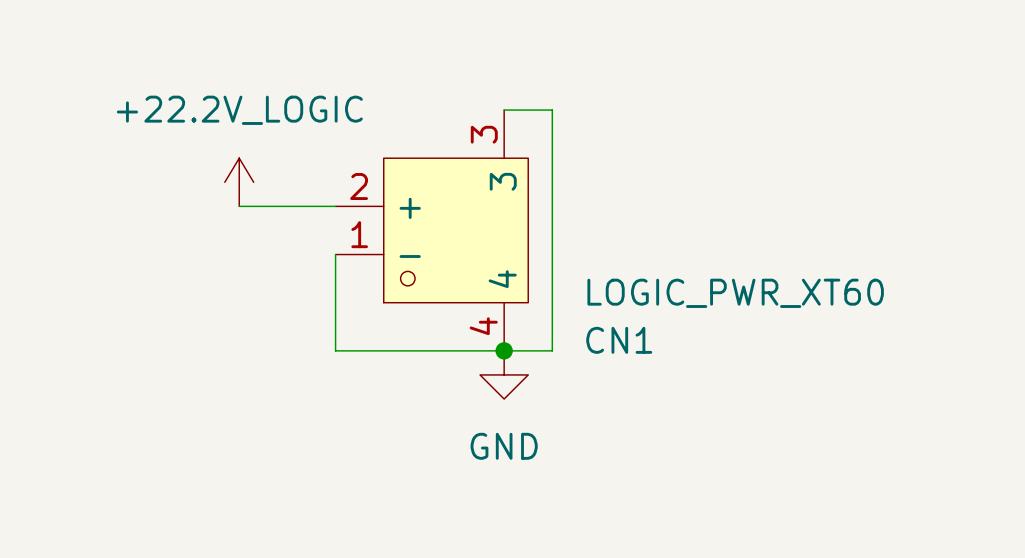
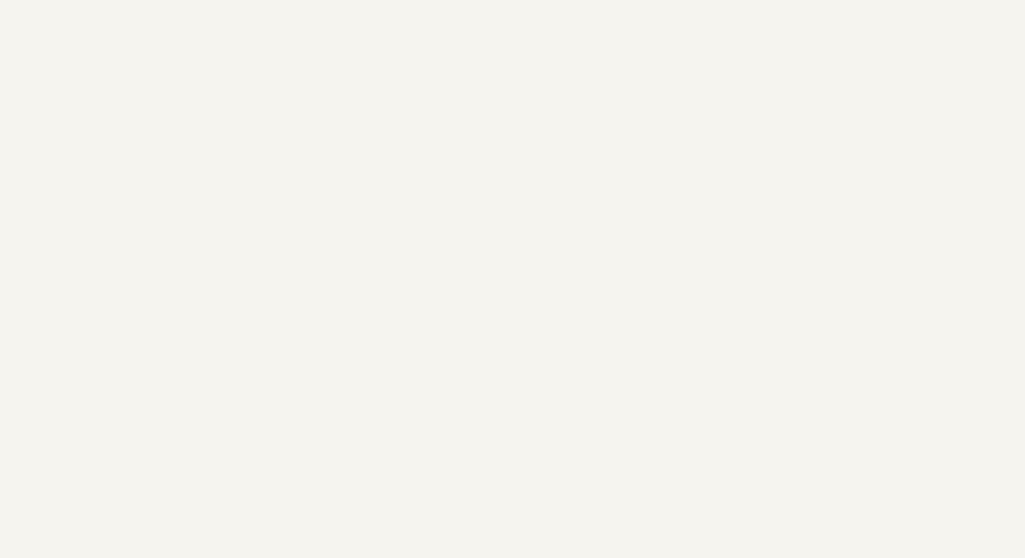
wire: (504, 110) (552, 110) (552, 350) (335, 350) (335, 254) -> none
power symbol: +22.2V_LOGIC (239, 182) -> none
wire: (239, 206) (335, 206) -> none
CN1: LOGIC_PWR_XT60 (431, 230) -> none
junction: (504, 350) -> none
power symbol: GND (504, 374) -> none

